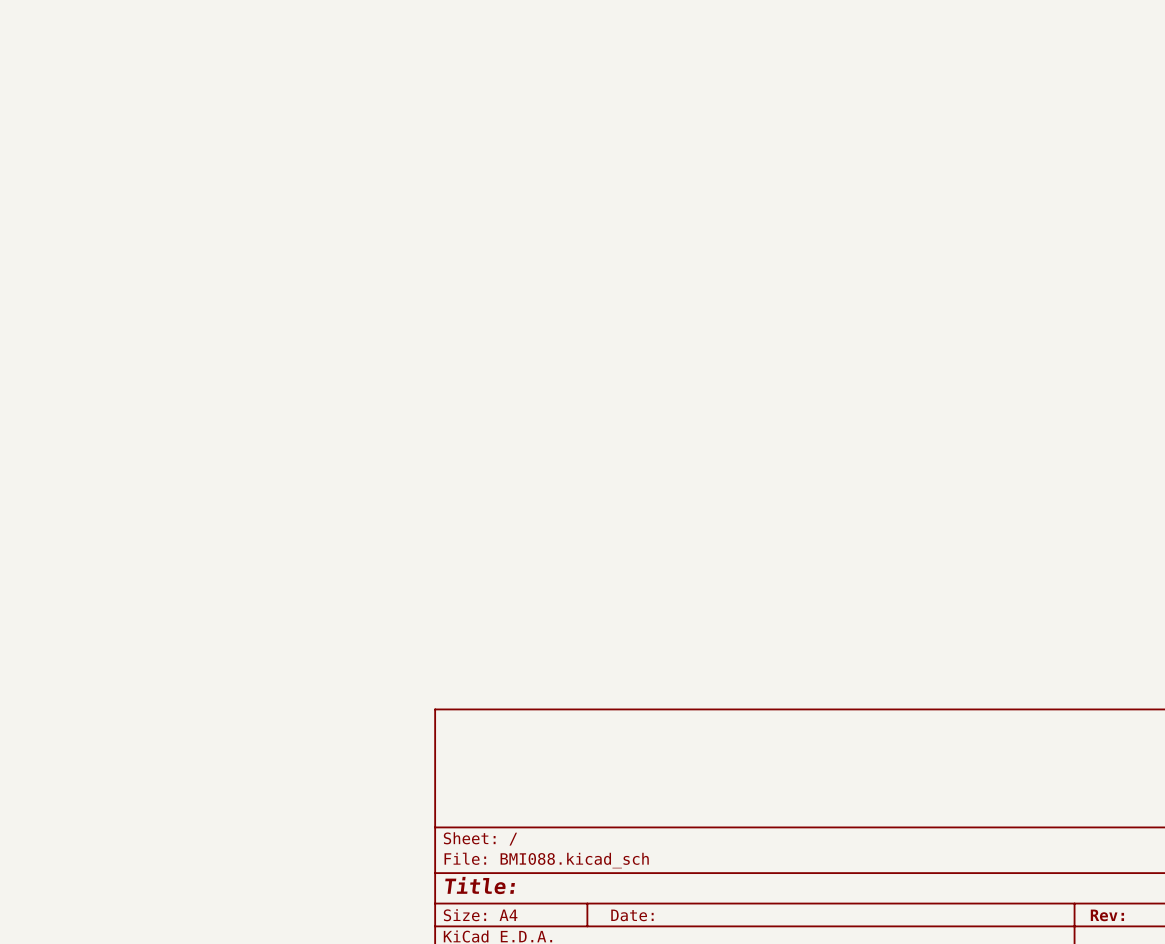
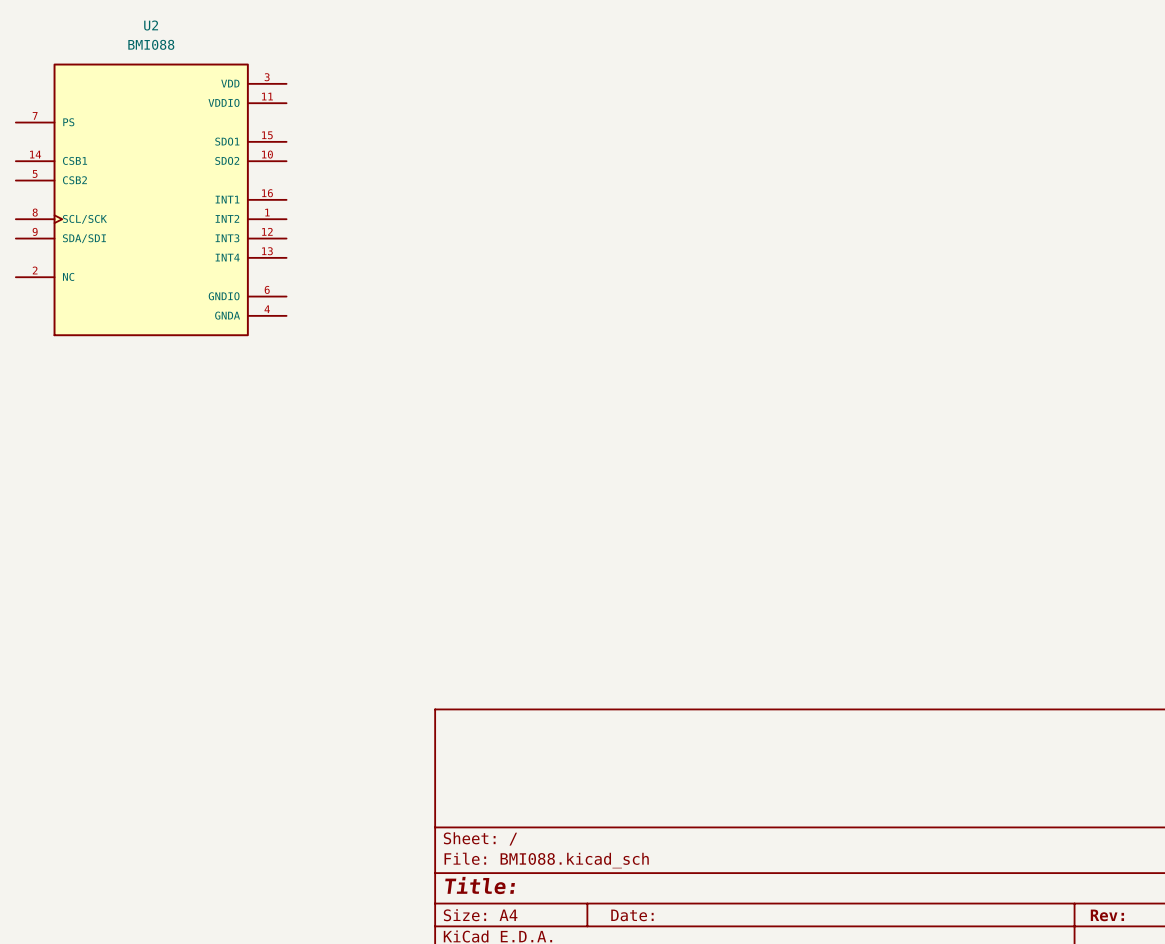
U2: none -> BMI088 (151, 199)

